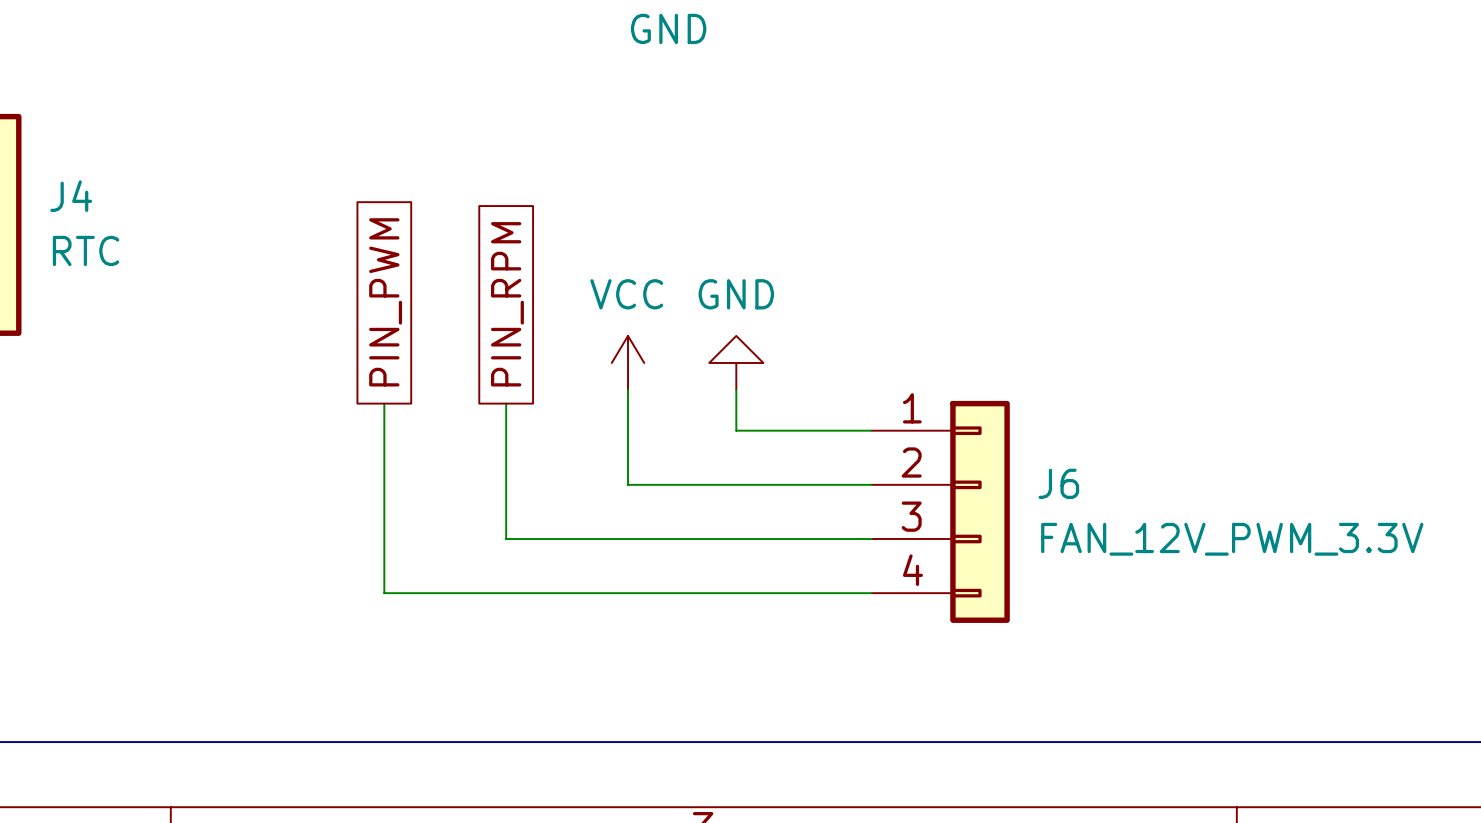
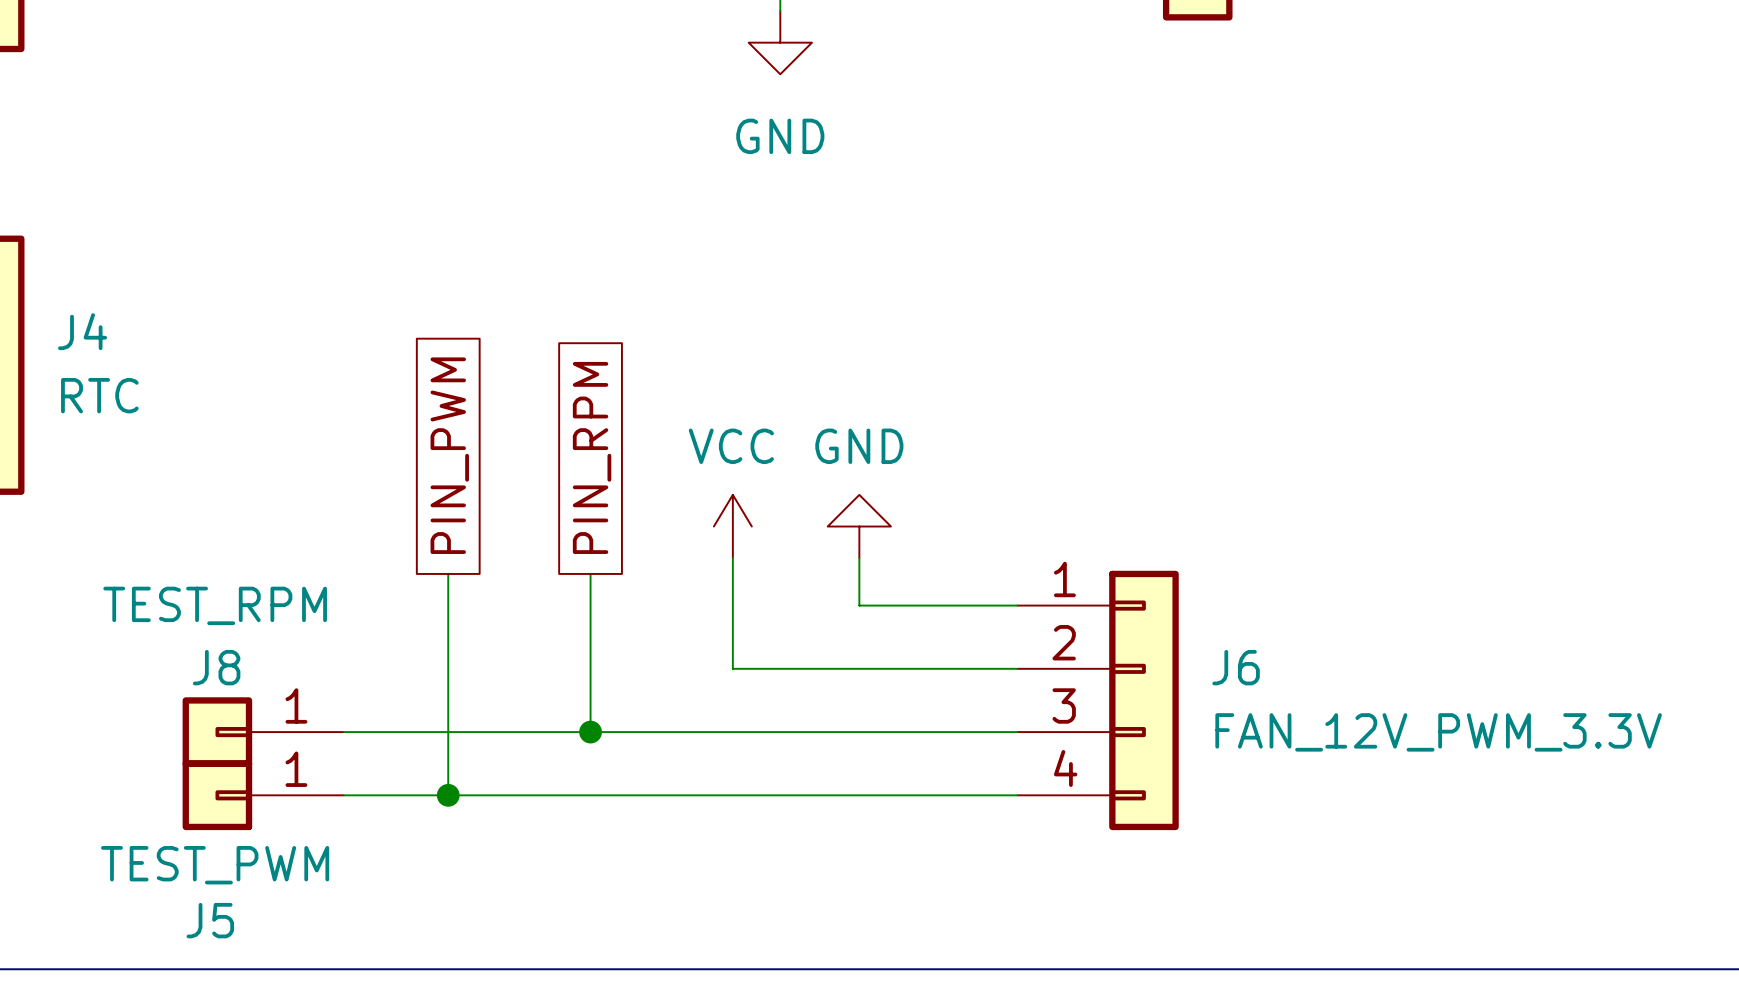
J8: none -> TEST_RPM (263, 732)
wire: none -> (343, 732) (590, 732)
junction: none -> (590, 732)
J5: none -> TEST_PWM (263, 795)
wire: none -> (343, 795) (448, 795)
junction: none -> (448, 795)

